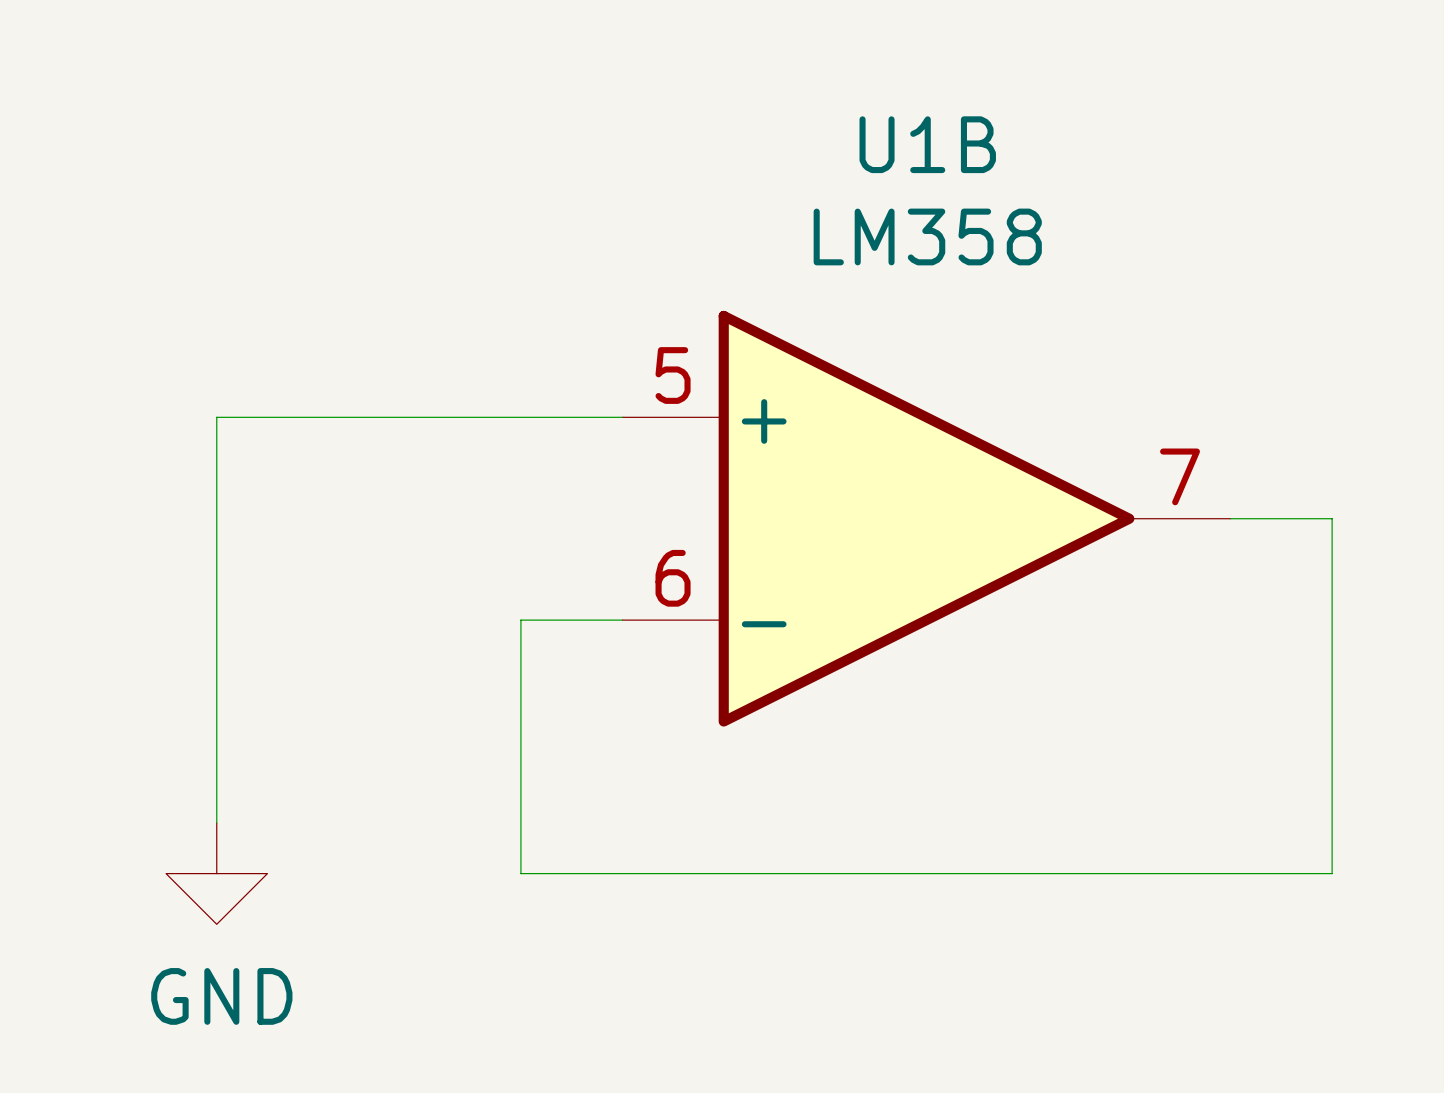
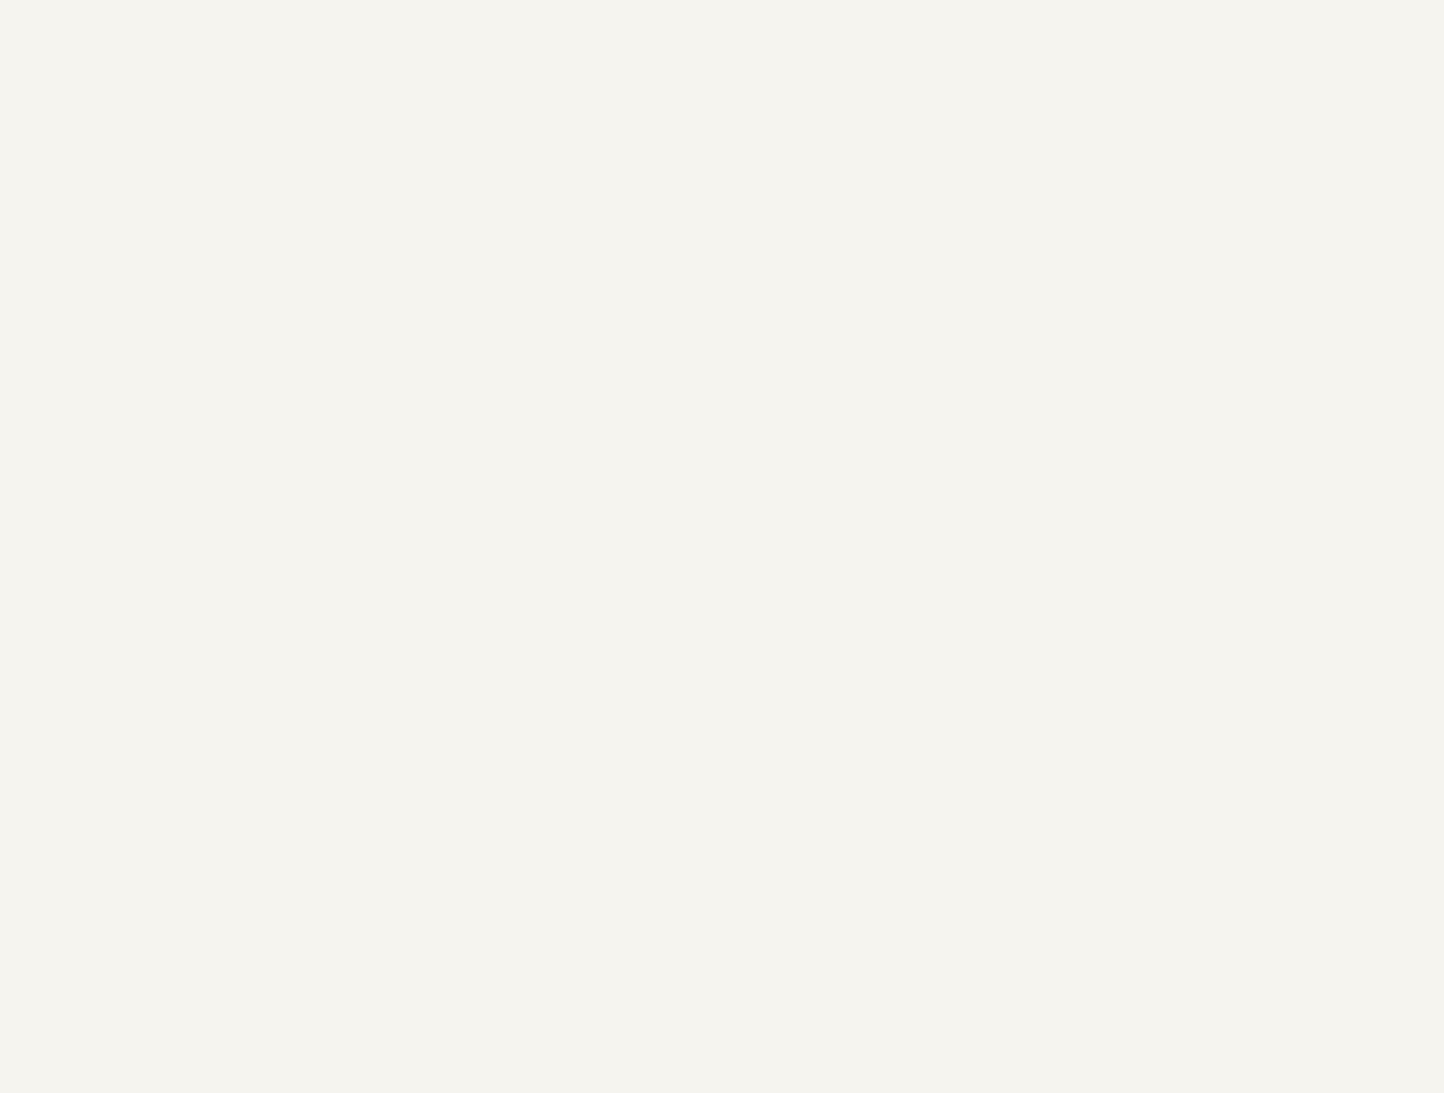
wire: (622, 417) (216, 417) (216, 822) -> none
U1B: LM358 (926, 518) -> none
wire: (1230, 518) (1332, 518) (1332, 873) (520, 873) (520, 620) (622, 620) -> none
power symbol: GND (216, 873) -> none

